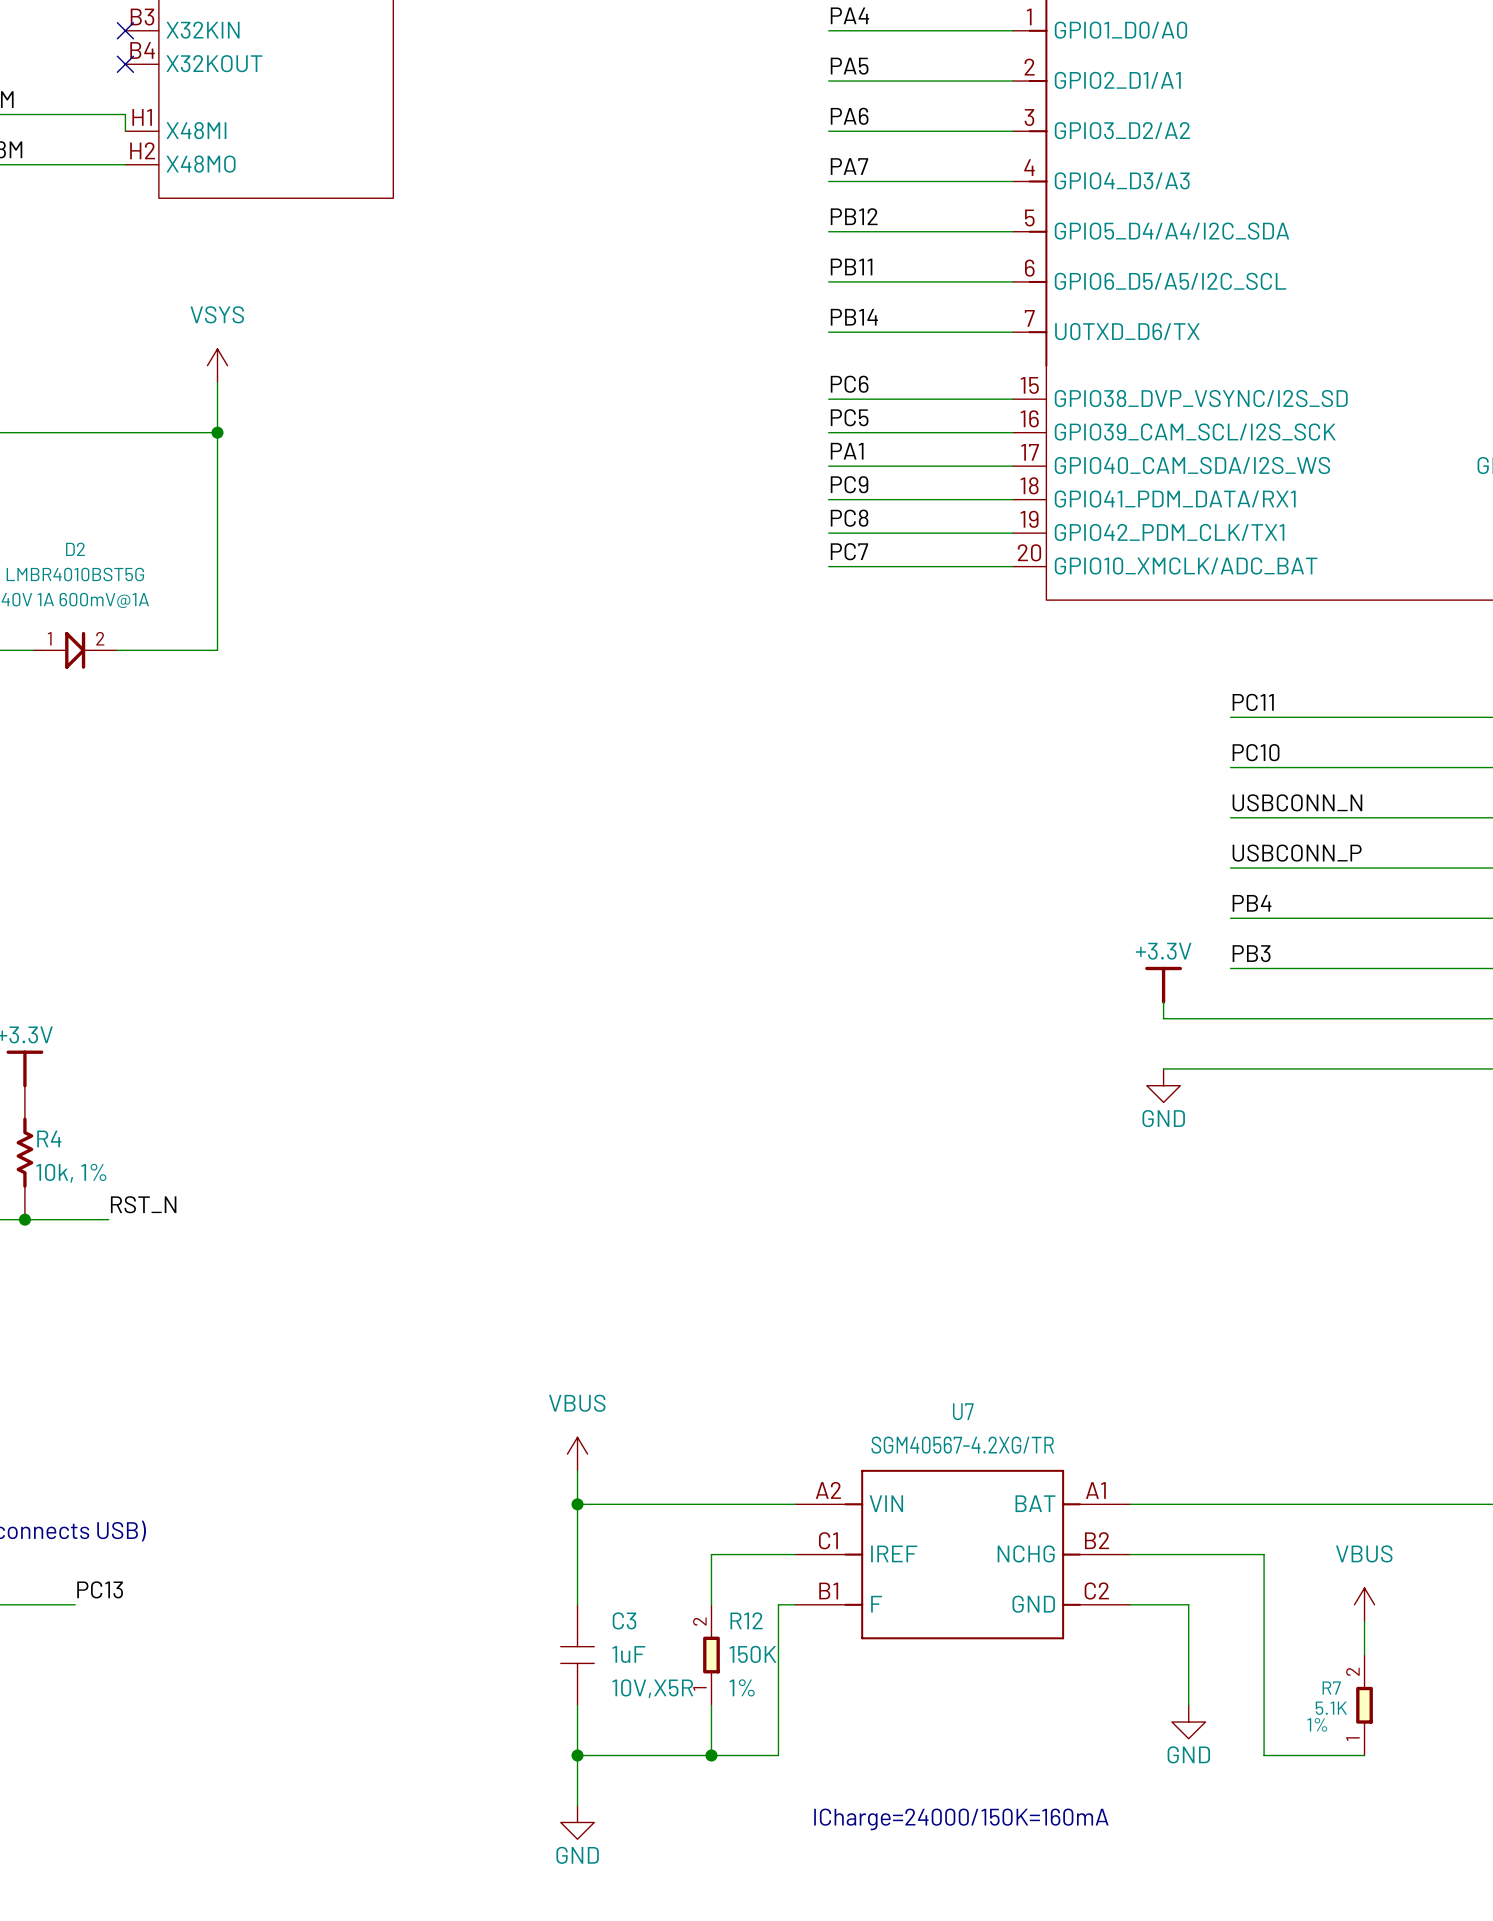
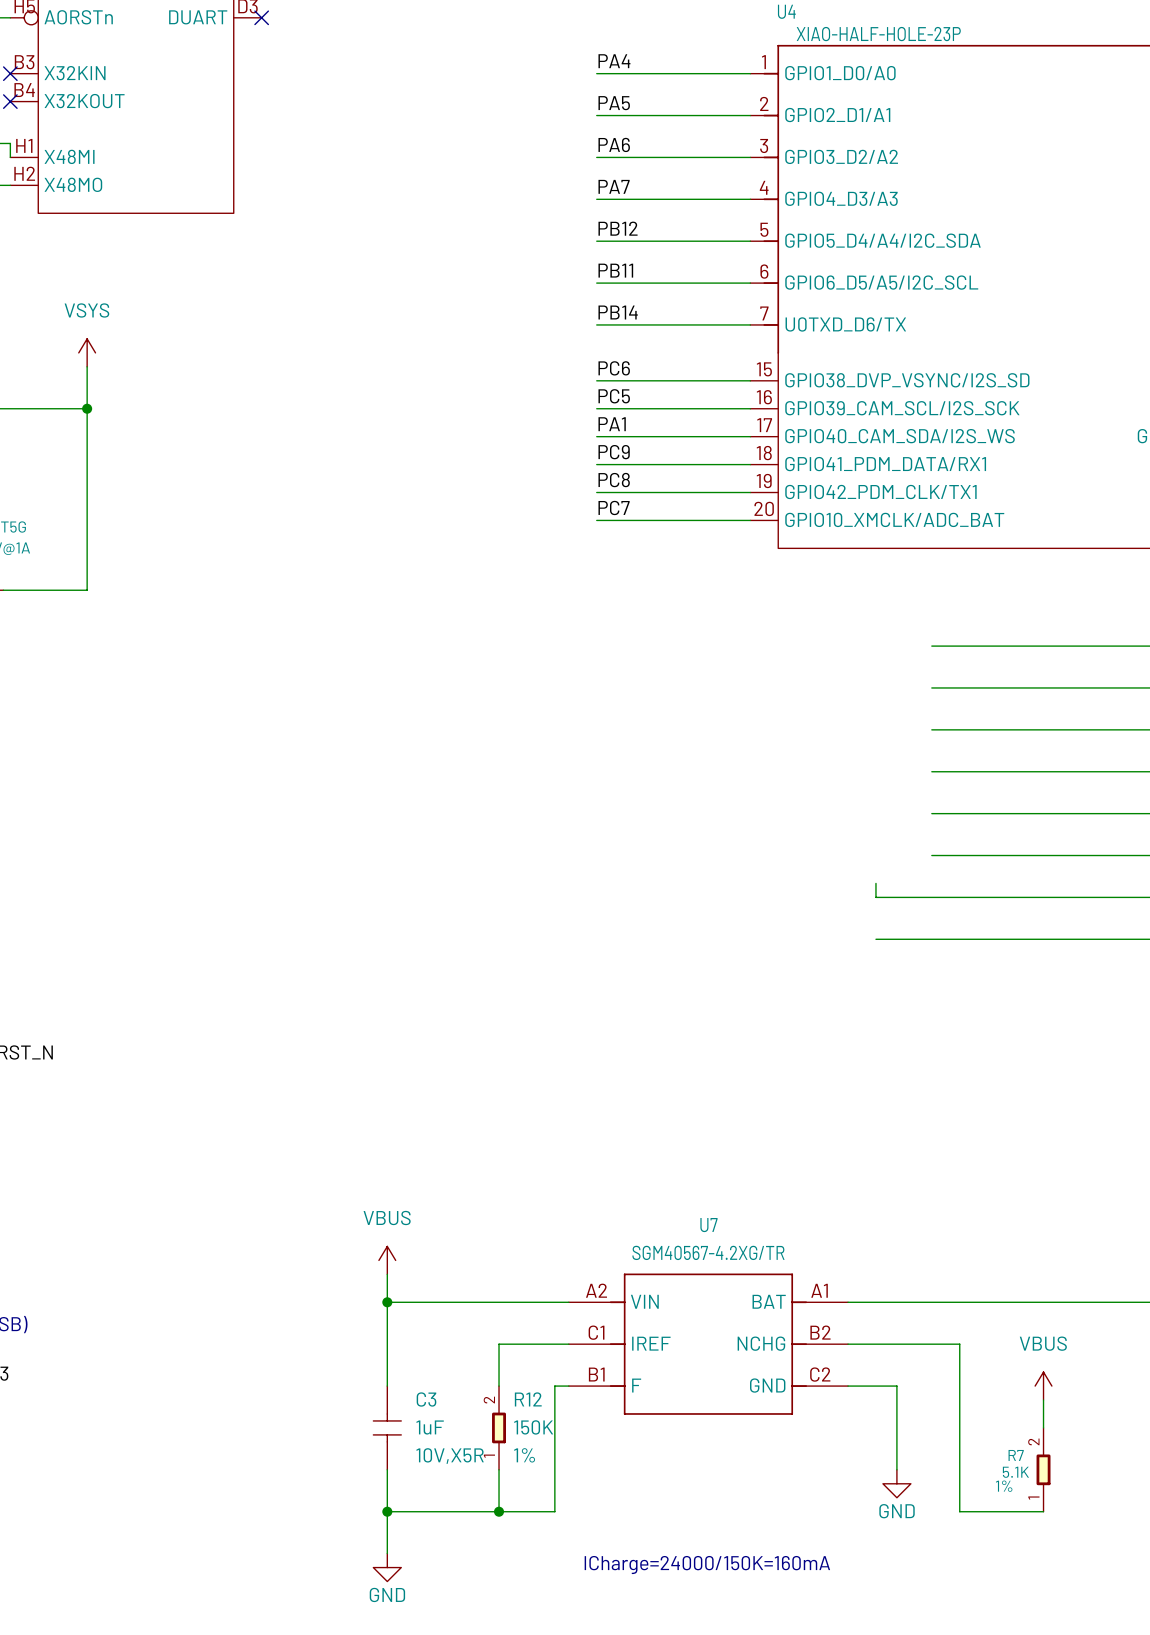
label: PC11 (1253, 702) -> none
label: PC10 (1256, 752) -> none
label: USBCONN_N (1297, 802) -> none
label: USBCONN_P (1297, 853) -> none
label: PB4 (1252, 903) -> none
label: PB3 (1251, 953) -> none
power symbol: +3.3V (1163, 985) -> none
power symbol: GND (1163, 1085) -> none

